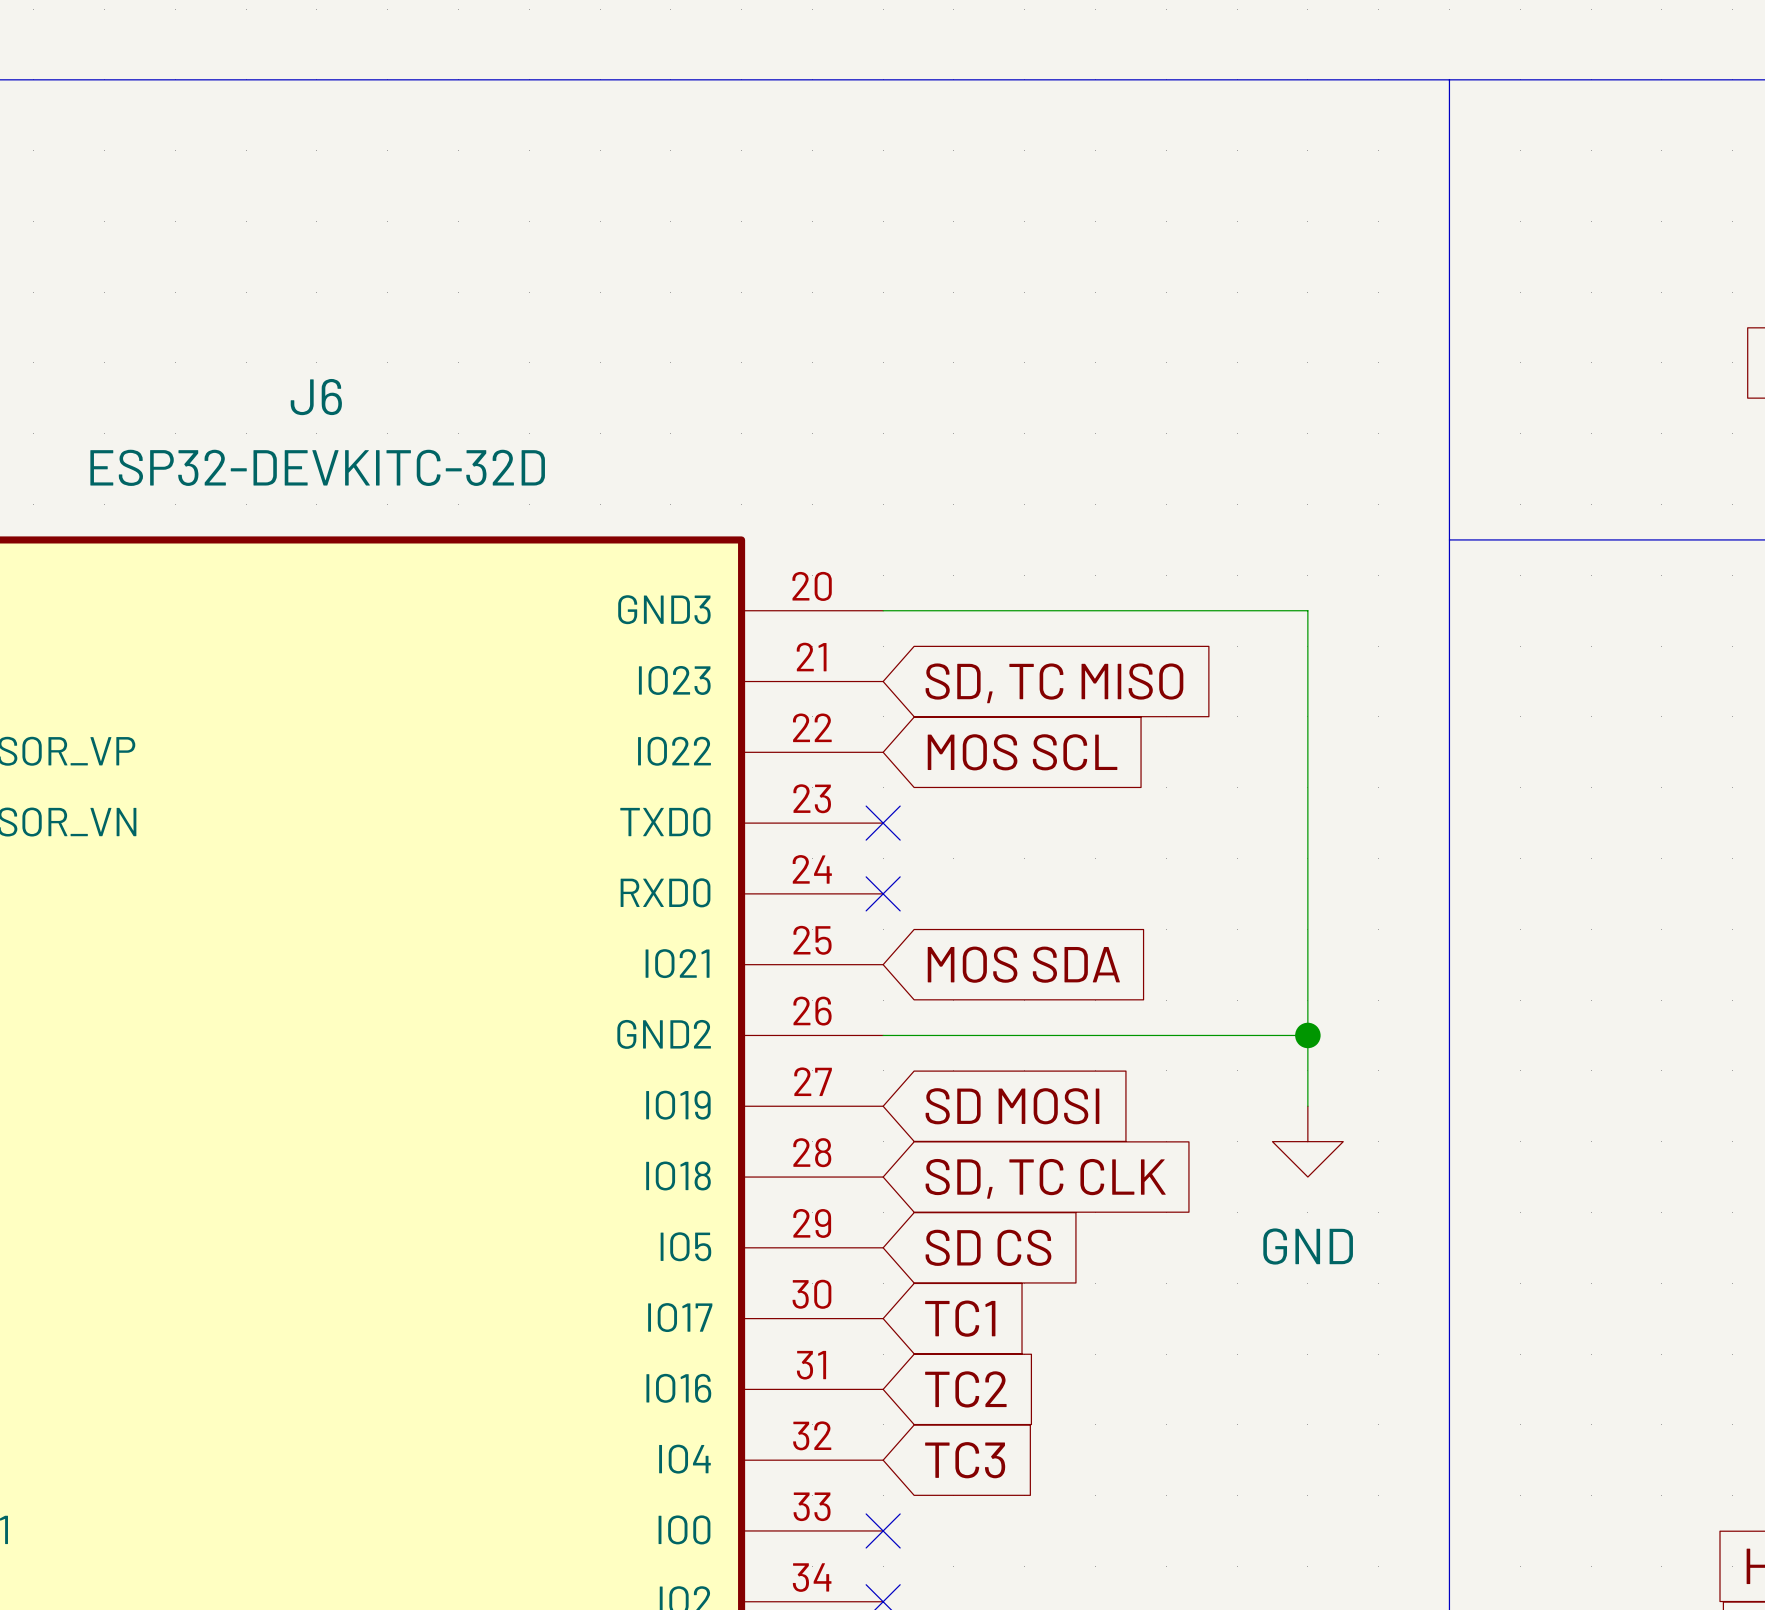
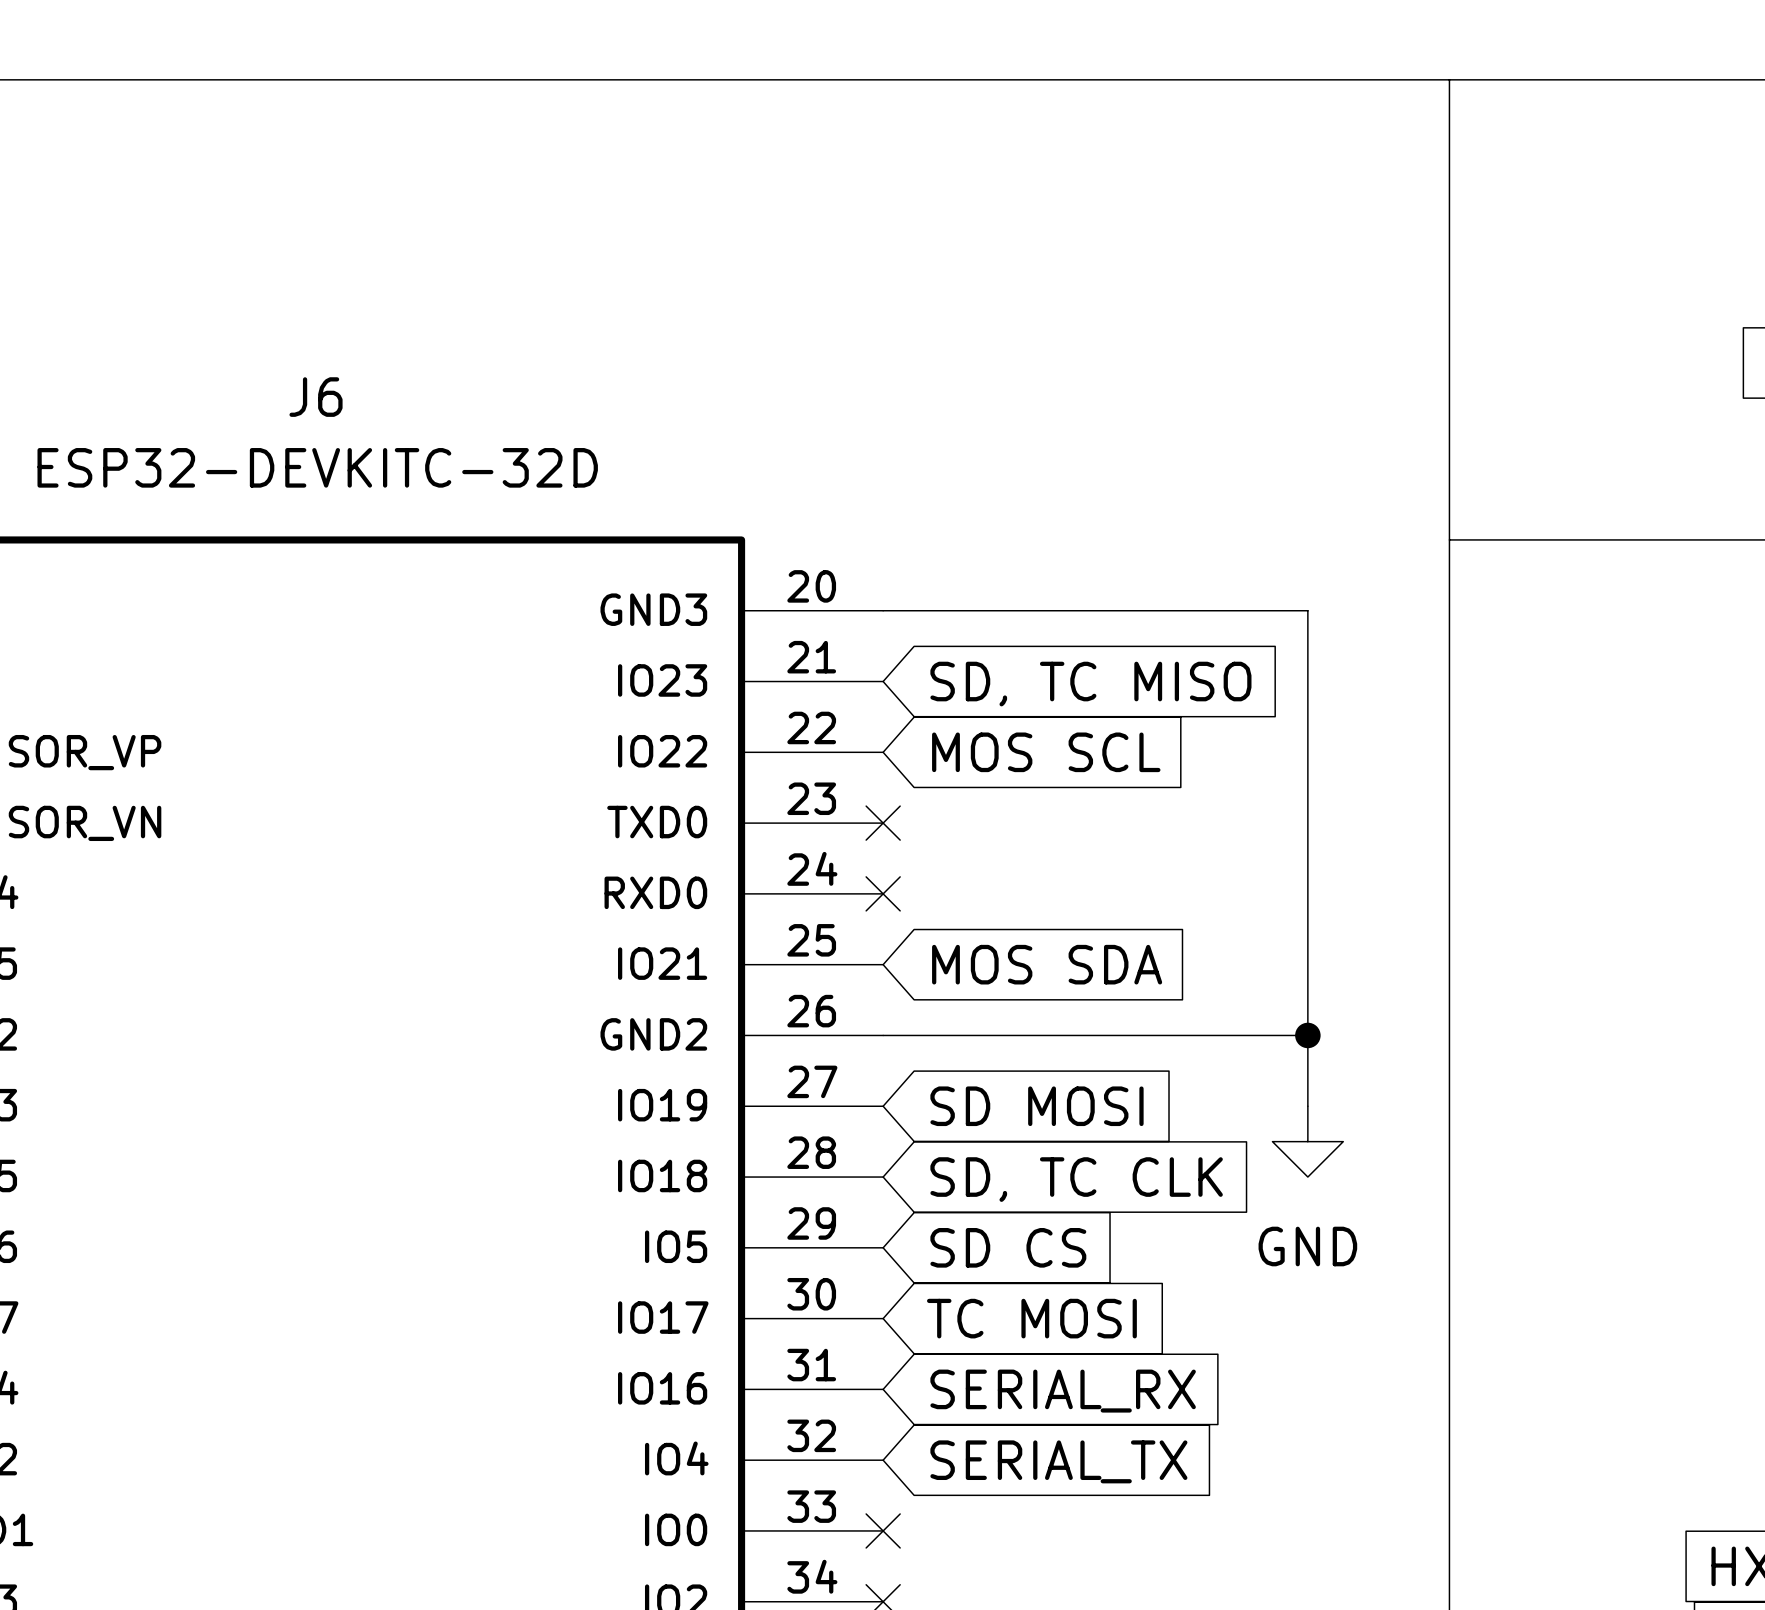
global label: TC1 (960, 1318) -> TC MOSI (1031, 1318)
global label: TC2 (965, 1389) -> SERIAL_RX (1063, 1391)
global label: TC3 (965, 1460) -> SERIAL_TX (1058, 1461)

